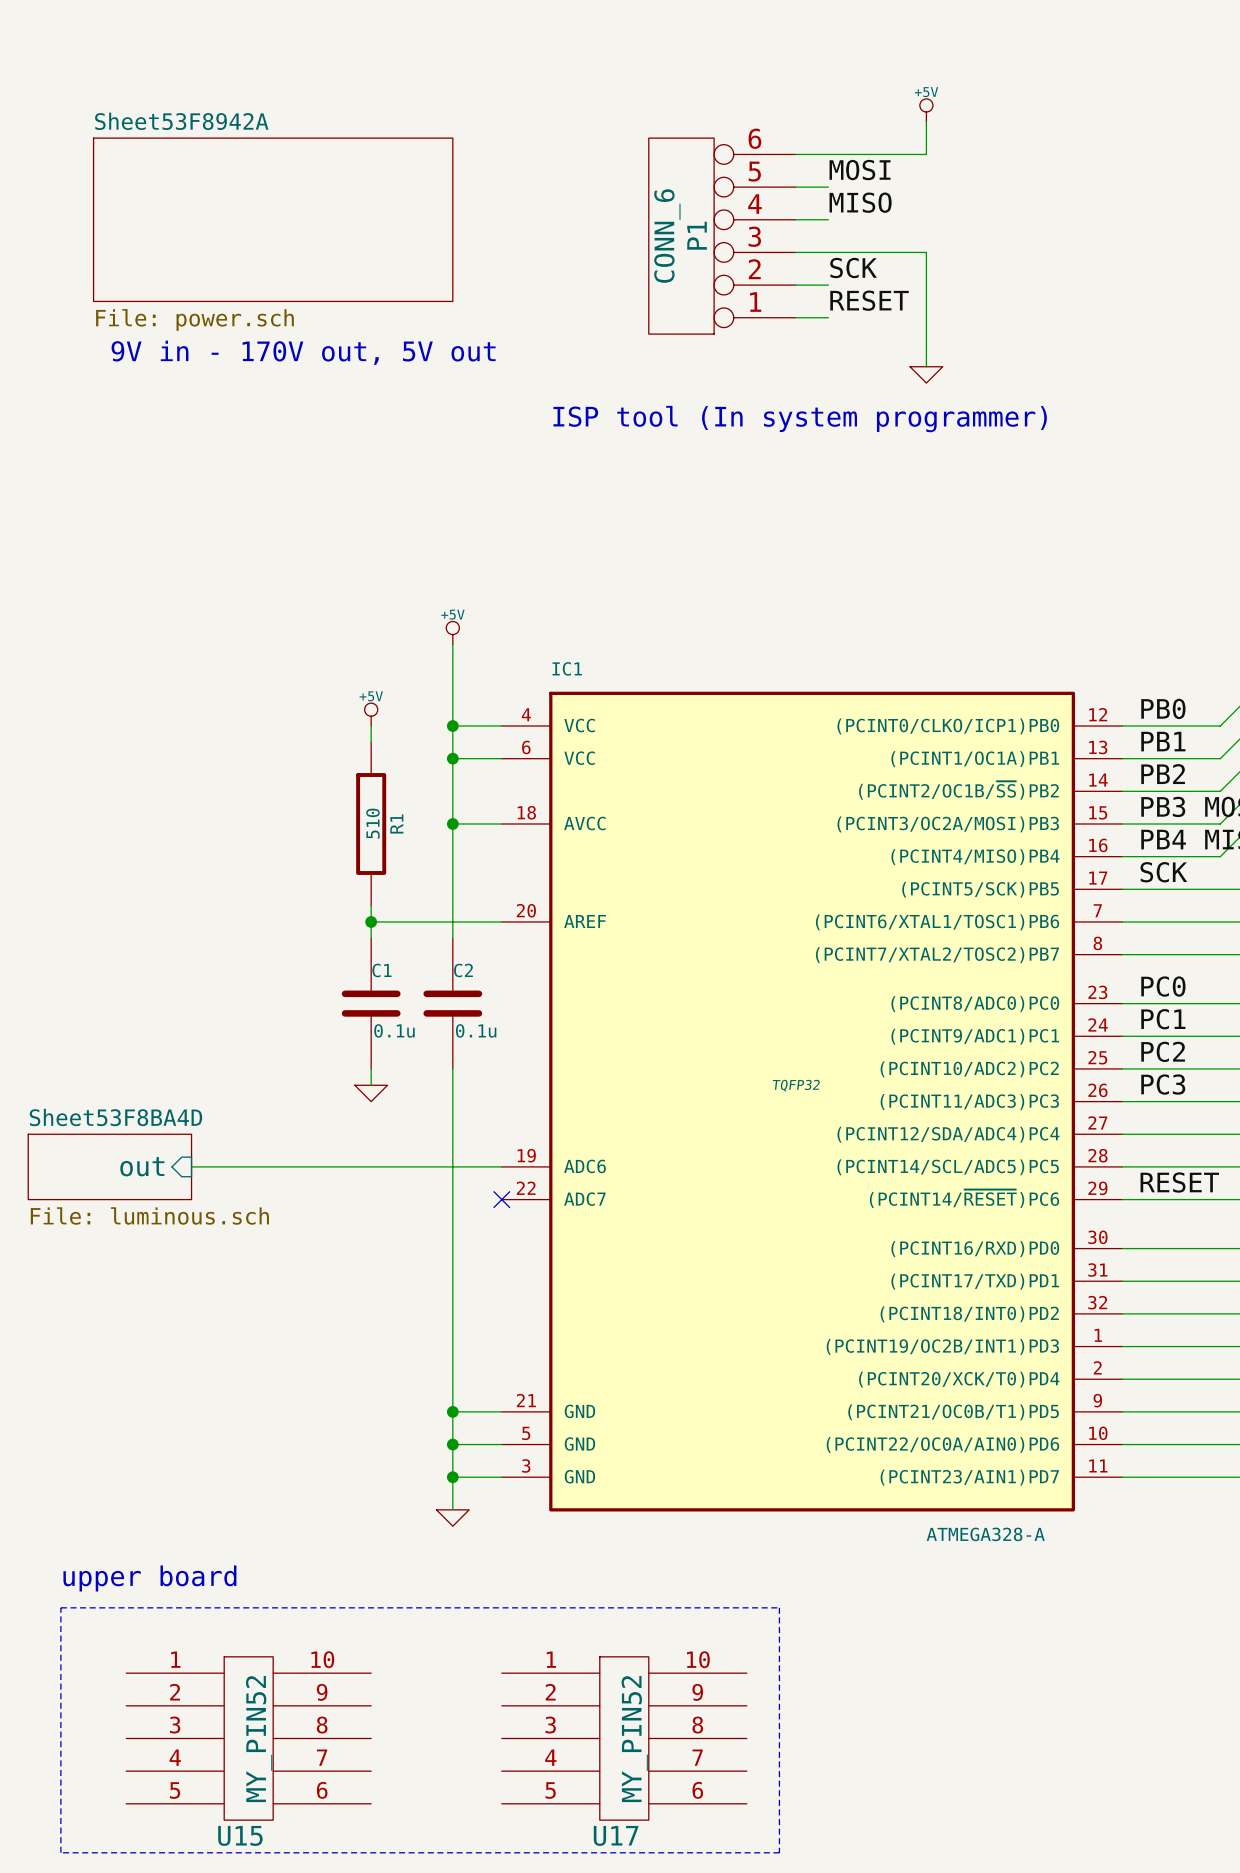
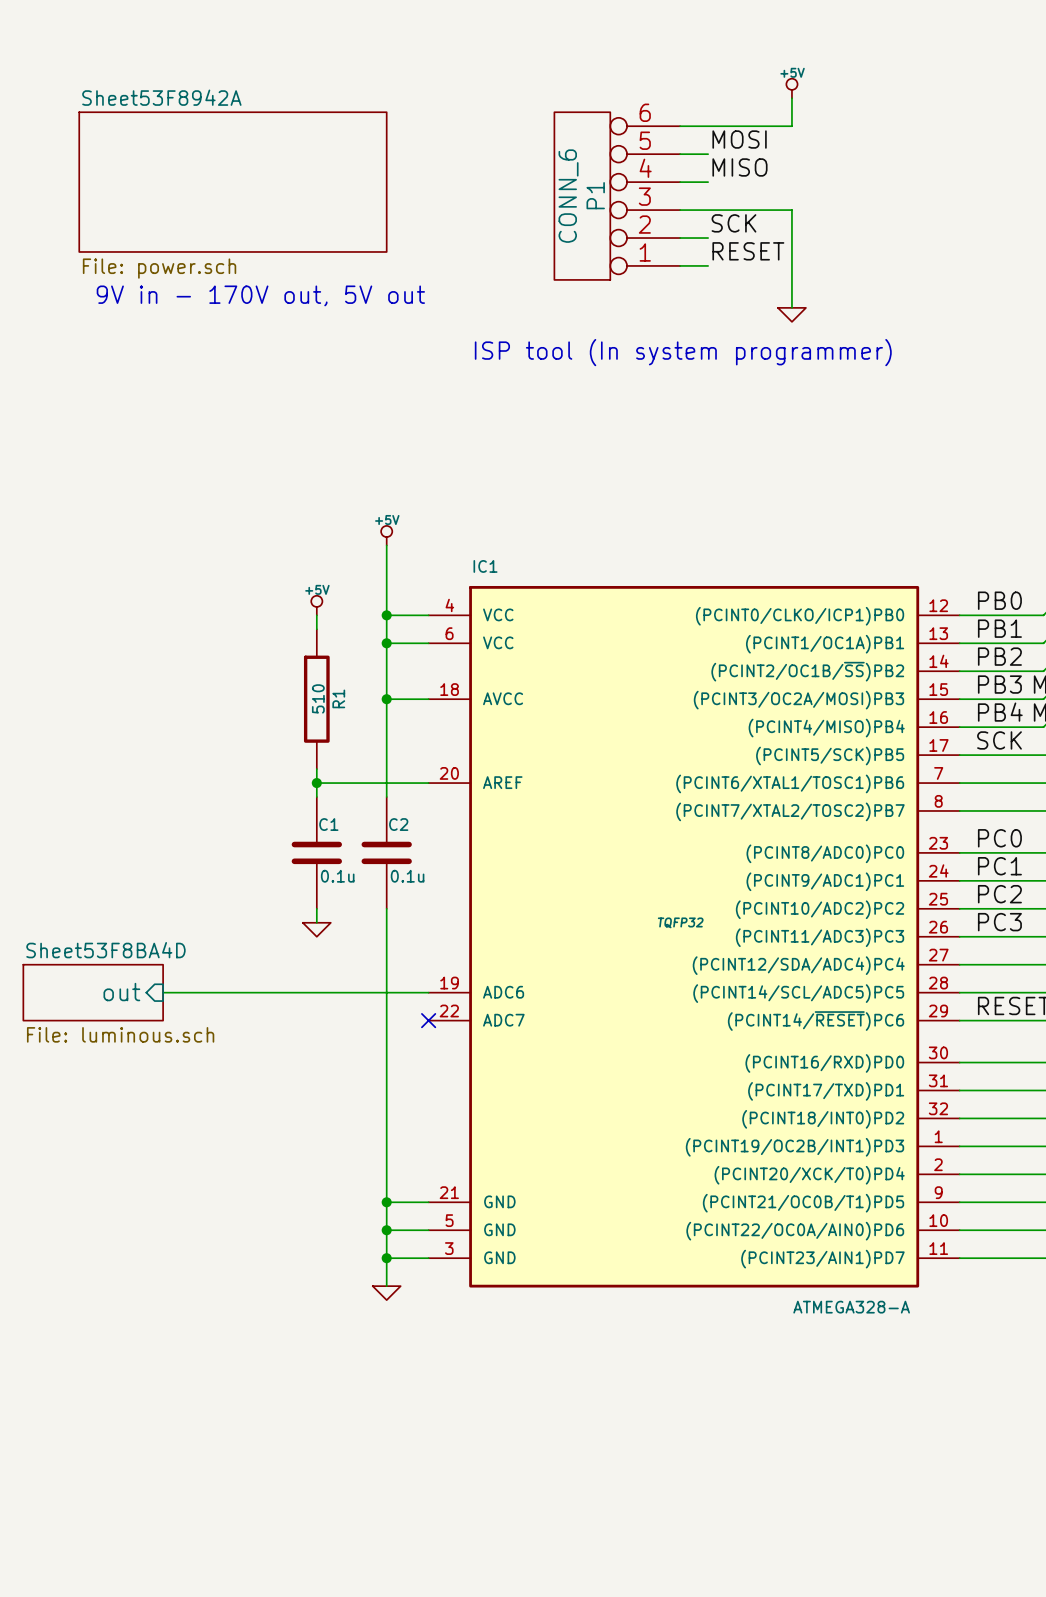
text: upper board (149, 1578) -> none
line: (60, 1607) (60, 1852) (779, 1852) (779, 1607) (60, 1607) -> none
U15: MY_PIN52 (248, 1738) -> none
U17: MY_PIN52 (624, 1738) -> none

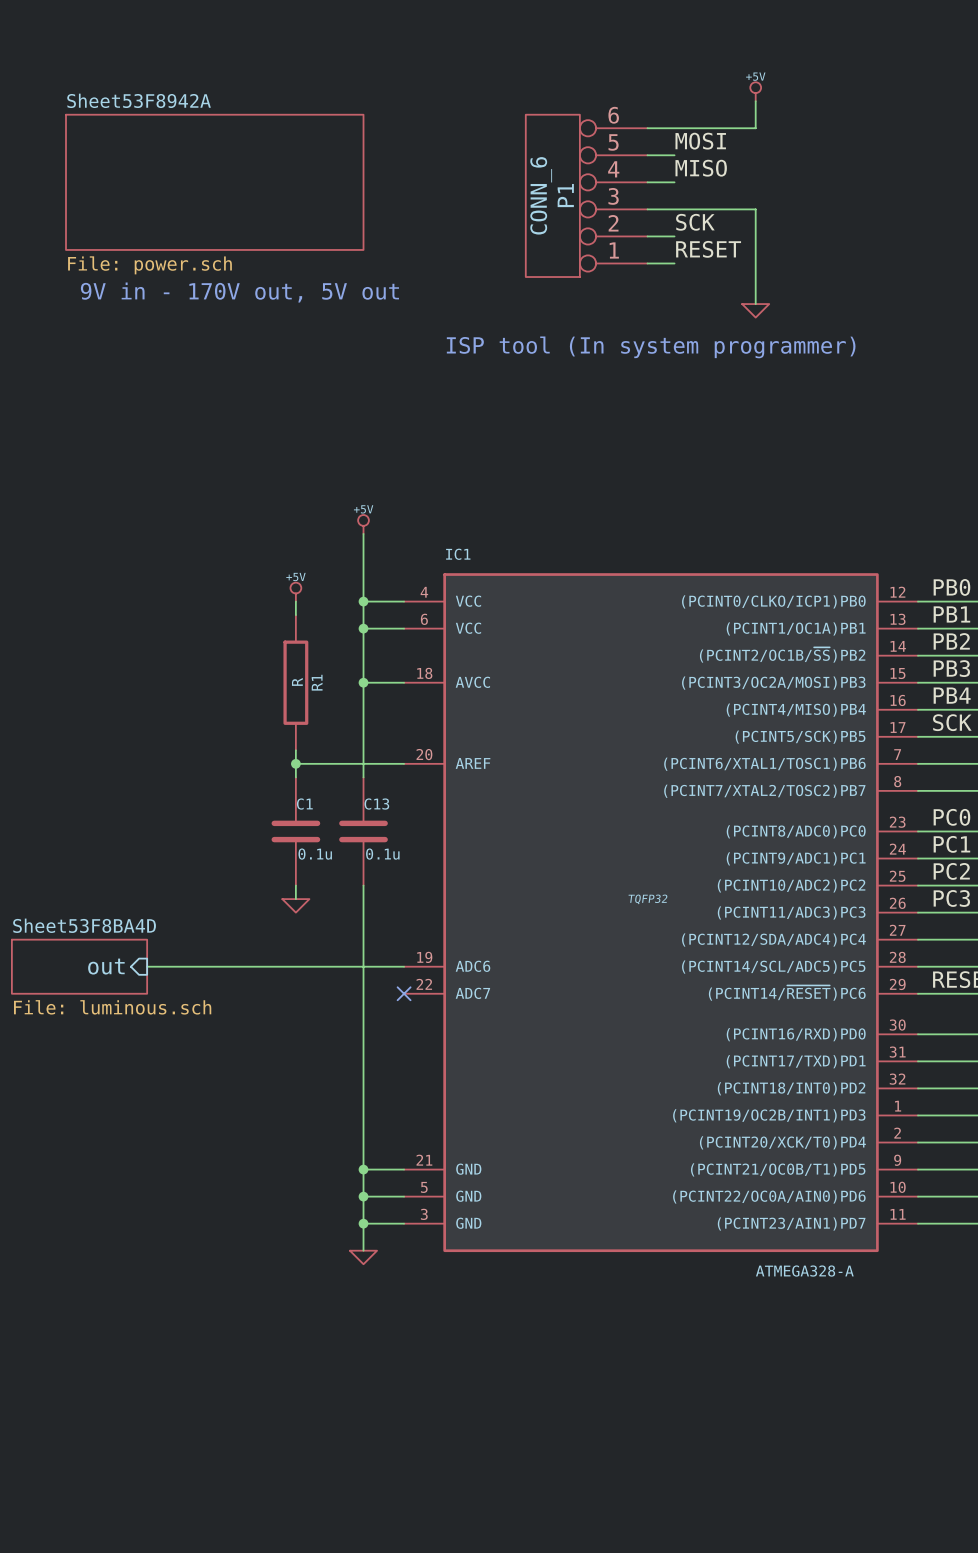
R1 value: 510 (318, 698) -> R (297, 681)
C2 name: C2 (398, 824) -> C13 (376, 804)

